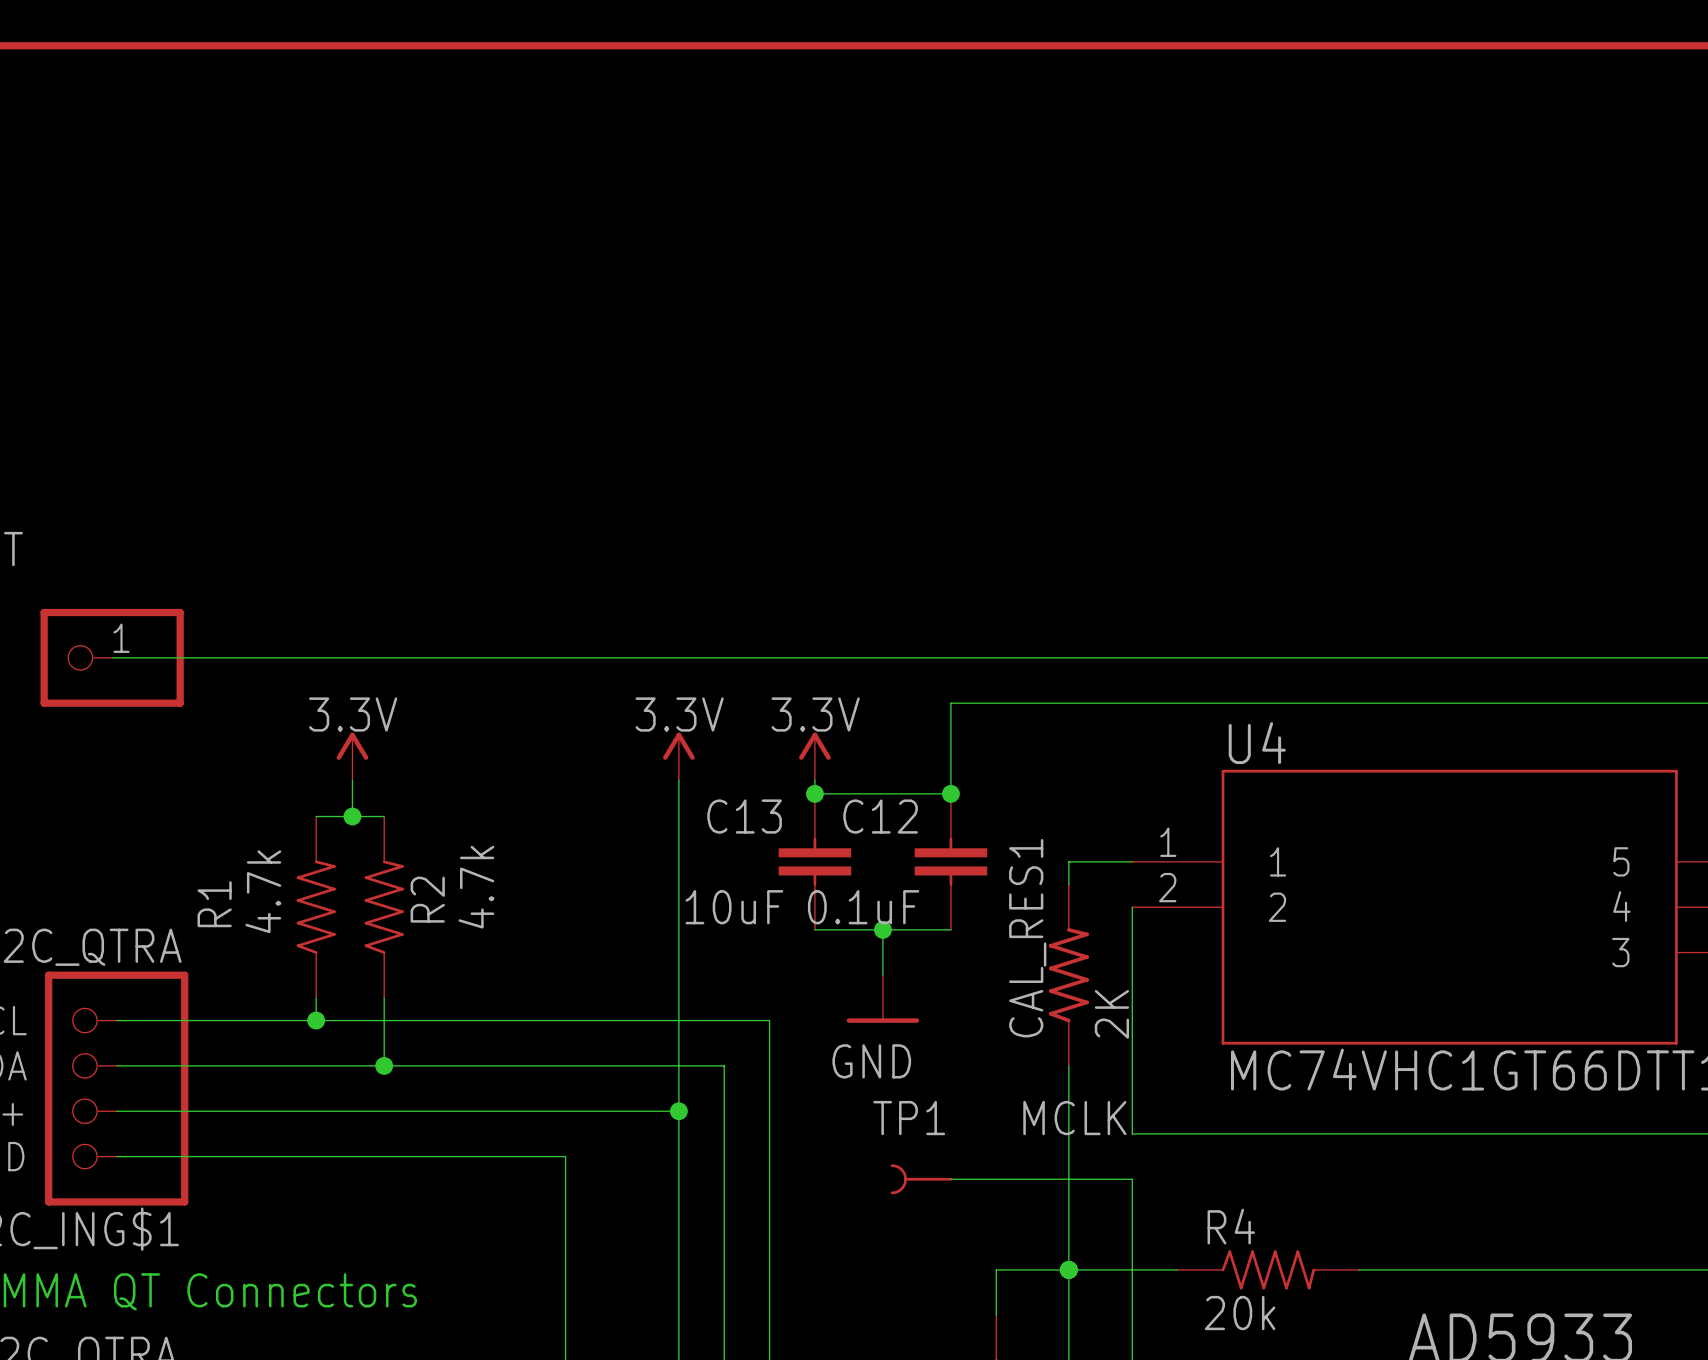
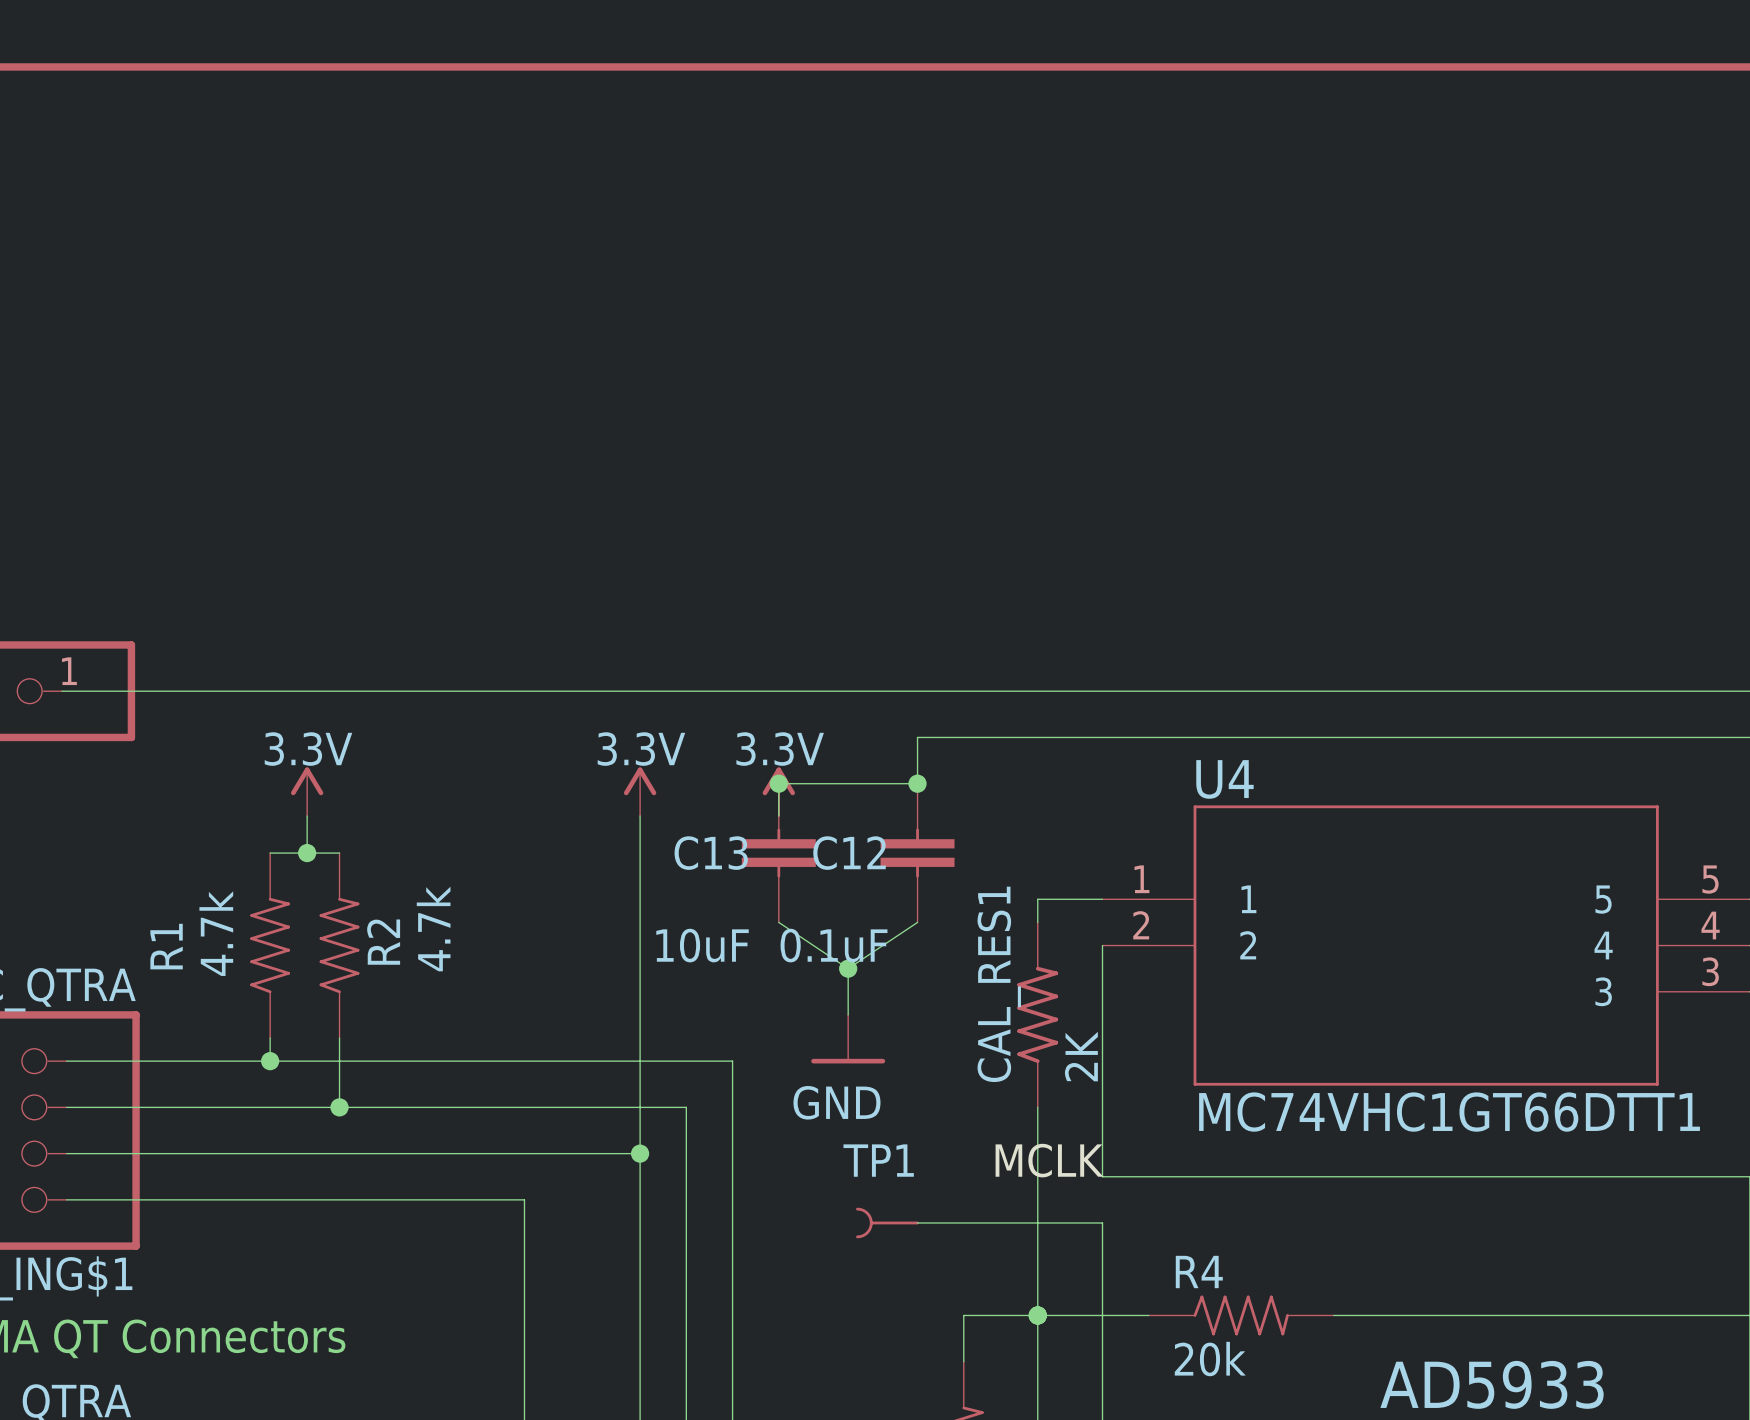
wire: (950, 748) (950, 793) (814, 793) (814, 780) -> (917, 783) (778, 783) (778, 816)
junction position: (814, 793) -> (778, 783)
junction position: (950, 793) -> (917, 783)
C13 position: (814, 861) -> (778, 853)
C12 position: (950, 861) -> (917, 853)
wire: none -> (778, 922) (848, 968) (917, 922)
wire: (814, 929) (950, 929) -> none

